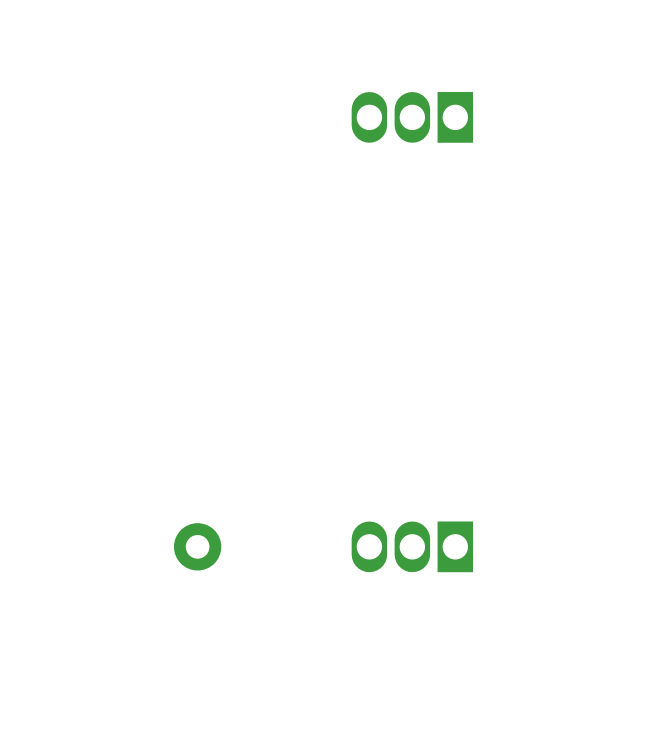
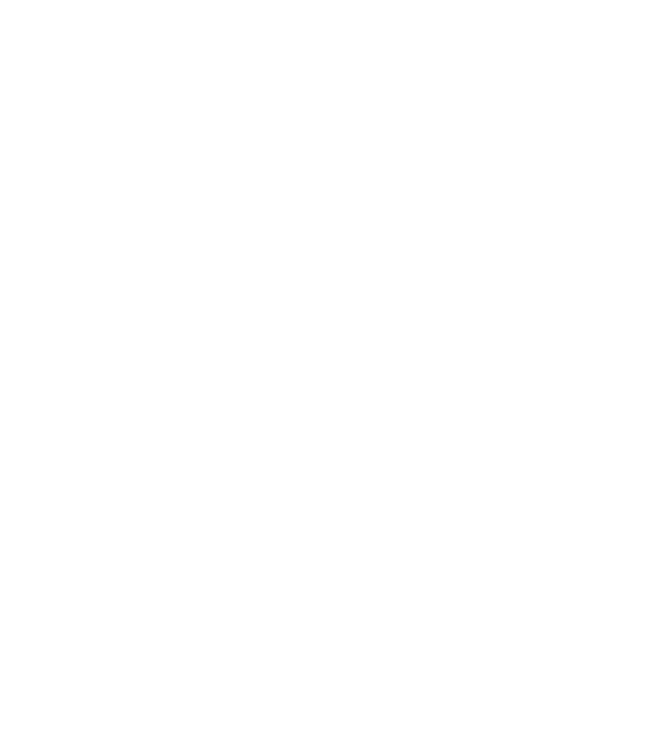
part: (412, 117) -> none
part: (197, 546) -> none
part: (412, 546) -> none

